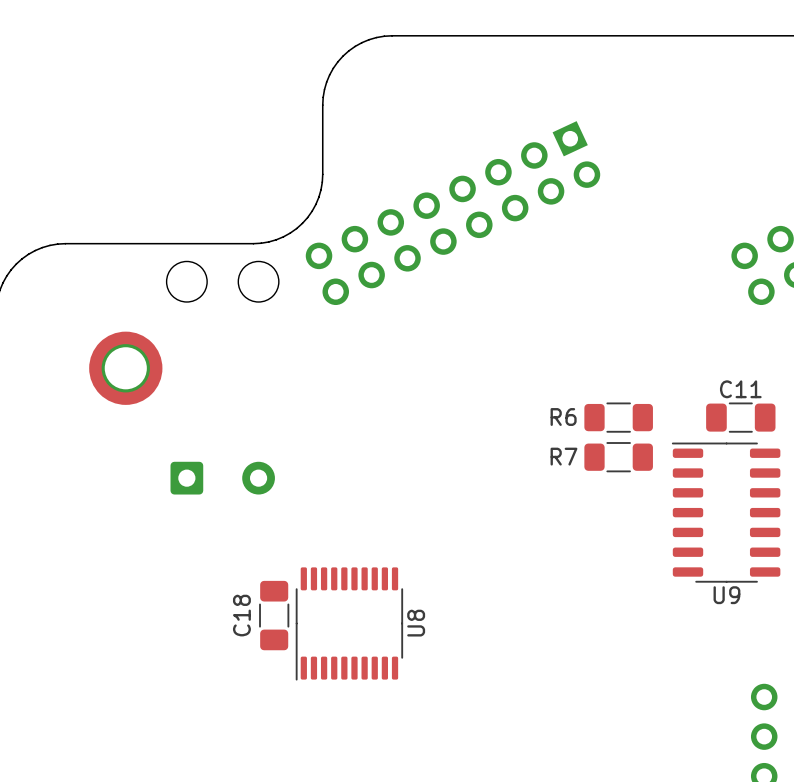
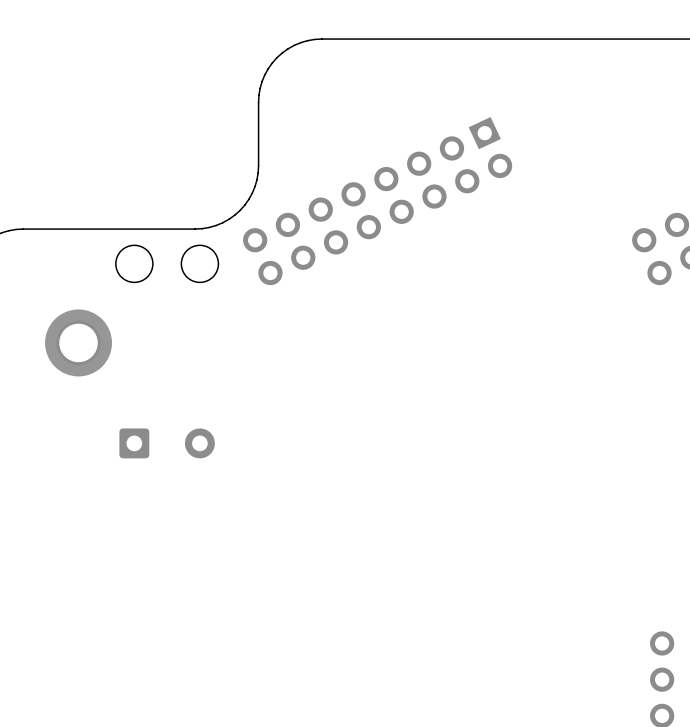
R6: (618, 417) -> none
C11: (740, 417) -> none
R7: (618, 457) -> none
U9: (726, 512) -> none
C18: (274, 615) -> none
U8: (349, 623) -> none

